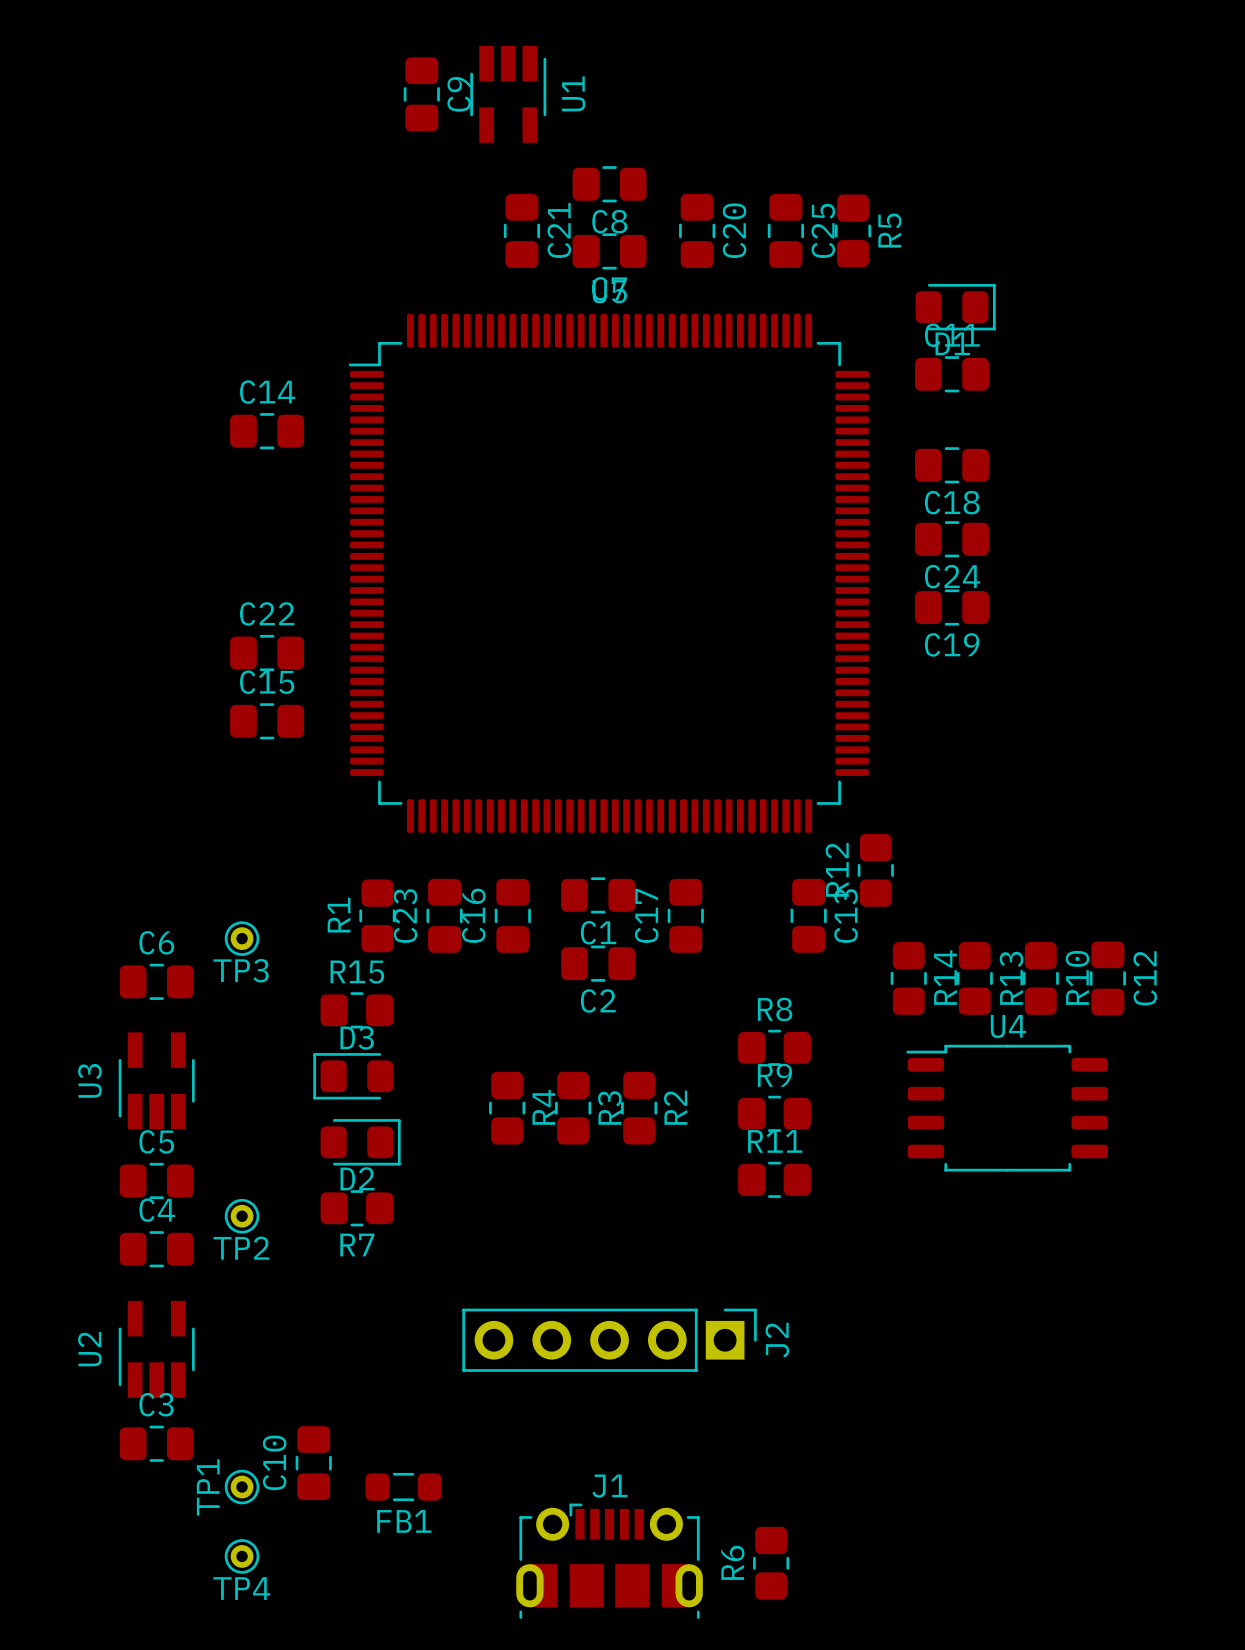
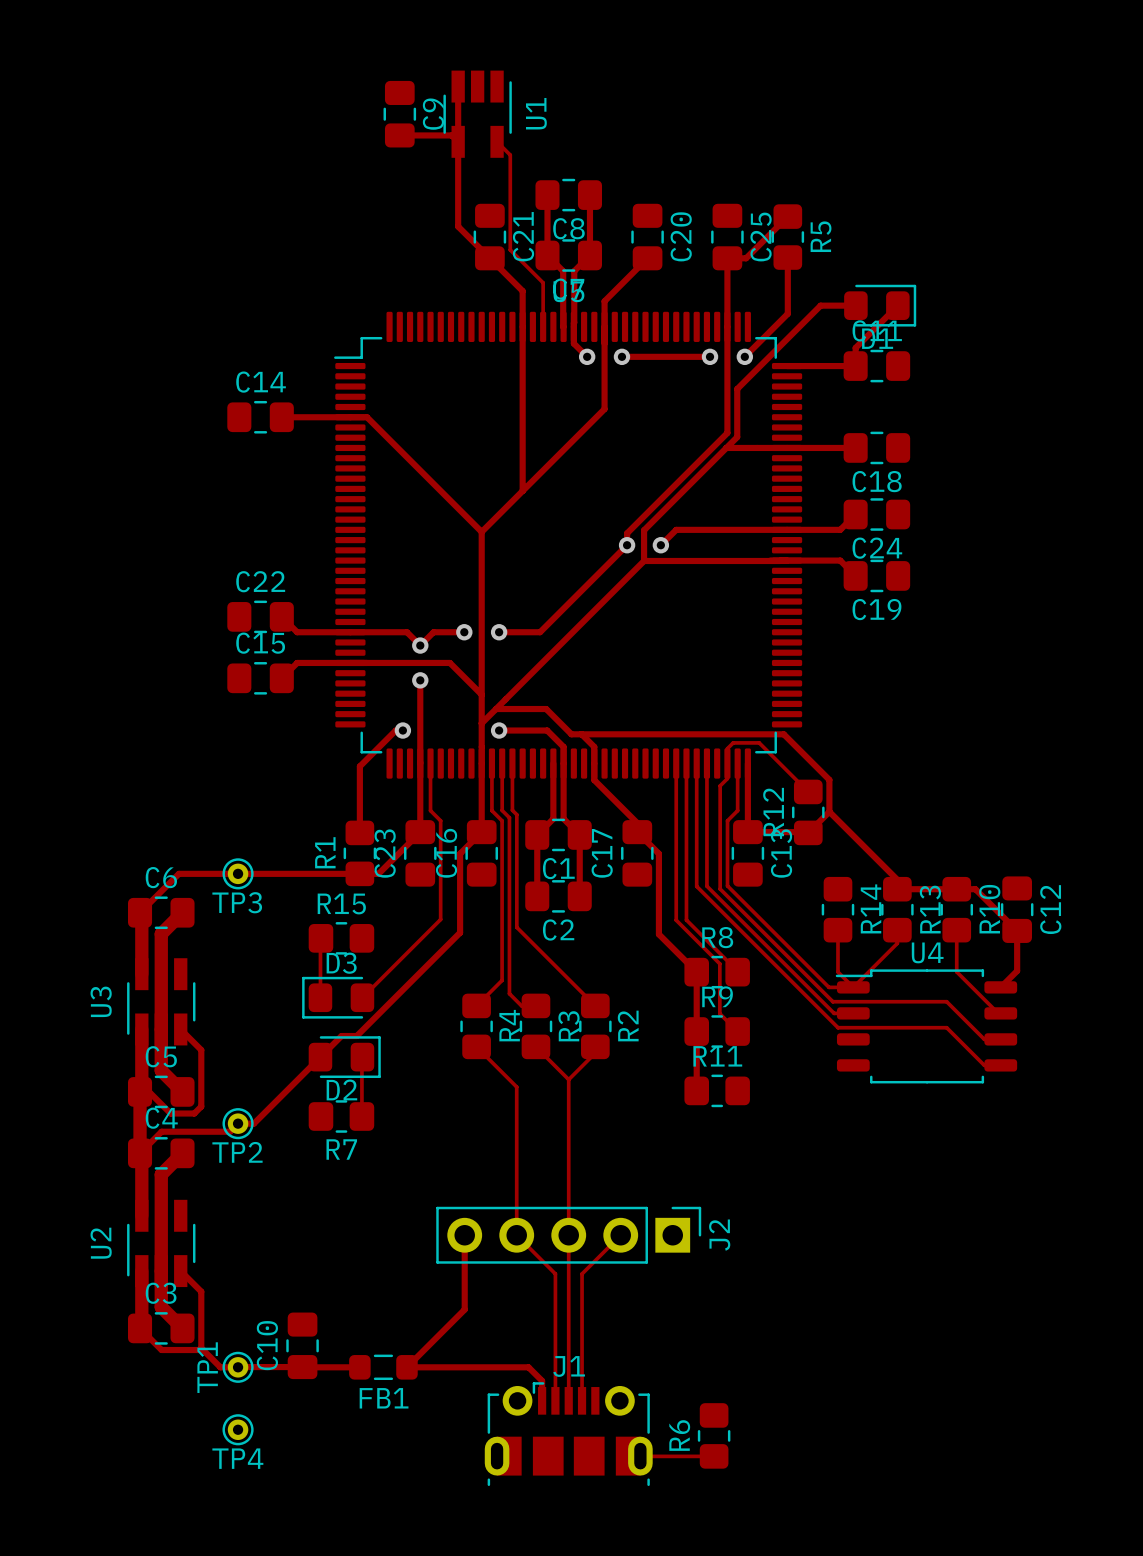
track: none -> (458, 86) (458, 226) (522, 291) (522, 491)
track: none -> (399, 135) (451, 135) (458, 141)
track: none -> (497, 141) (510, 155) (510, 249) (543, 282) (543, 326)
track: none -> (547, 195) (547, 255) (563, 271) (563, 326)
track: none -> (589, 195) (589, 255) (574, 271) (573, 343) (587, 356)
track: none -> (787, 216) (746, 258) (727, 258) (727, 433) (627, 533) (627, 545) (540, 632) (499, 632)
track: none -> (787, 257) (787, 313) (744, 356)
track: none -> (647, 258) (604, 301) (604, 409) (481, 531)
track: none -> (855, 305) (820, 305) (737, 389) (737, 437) (644, 530) (644, 560)
track: none -> (897, 305) (855, 347) (855, 366) (787, 366)
via: none -> (587, 356)
track: none -> (621, 356) (710, 356)
via: none -> (621, 356)
via: none -> (710, 356)
via: none -> (744, 356)
track: none -> (281, 417) (367, 417) (481, 531)
track: none -> (726, 447) (855, 447)
track: none -> (855, 514) (840, 529) (676, 529) (660, 545)
track: none -> (481, 531) (481, 832) (460, 853) (460, 932) (356, 1036) (341, 1036) (253, 1123) (238, 1123) (229, 1131) (161, 1131) (140, 1153)
via: none -> (627, 545)
via: none -> (660, 545)
track: none -> (644, 560) (481, 723)
track: none -> (770, 560) (840, 560) (855, 575)
track: none -> (780, 560) (644, 560)
track: none -> (281, 616) (297, 632) (406, 632) (420, 645) (433, 632) (464, 632)
via: none -> (464, 632)
via: none -> (499, 632)
via: none -> (420, 645)
track: none -> (281, 678) (297, 662) (449, 662) (481, 694)
track: none -> (420, 680) (420, 832) (378, 873) (178, 873) (140, 912) (141, 914) (141, 974)
via: none -> (420, 680)
track: none -> (496, 709) (546, 709) (571, 734) (783, 734) (829, 779) (829, 811)
track: none -> (402, 730) (395, 730) (359, 766) (359, 832)
via: none -> (402, 730)
track: none -> (499, 730) (547, 730) (563, 746) (563, 818) (579, 834) (579, 896)
via: none -> (499, 730)
track: none -> (581, 734) (594, 746) (594, 780) (637, 823) (637, 832) (658, 853) (658, 934) (696, 972) (696, 1090)
track: none -> (430, 763) (430, 810) (440, 820) (440, 919) (362, 997)
track: none -> (491, 763) (491, 810) (502, 820) (502, 980) (476, 1005)
track: none -> (502, 763) (502, 810) (509, 817) (509, 993) (521, 1005) (535, 1005)
track: none -> (512, 763) (512, 810) (516, 814) (516, 927) (595, 1005)
track: none -> (553, 763) (553, 818) (537, 834) (537, 896)
track: none -> (676, 763) (676, 920) (719, 963) (719, 1013) (737, 1031)
track: none -> (686, 763) (686, 920) (737, 972)
track: none -> (696, 763) (696, 886) (838, 1027) (946, 1027) (984, 1065) (1000, 1065)
track: none -> (706, 763) (706, 886) (834, 1013) (853, 1013)
track: none -> (737, 763) (737, 810) (727, 820) (727, 885) (828, 987) (853, 987)
track: none -> (747, 763) (747, 832) (808, 832) (829, 811)
track: none -> (808, 791) (759, 742) (733, 742) (727, 748) (727, 778) (720, 785) (720, 888) (832, 1001) (946, 1001) (984, 1039) (1000, 1039)
track: none -> (829, 811) (897, 879) (897, 889) (975, 889) (1017, 930) (1017, 971) (1000, 987)
track: none -> (182, 912) (161, 934) (161, 1070) (182, 1091)
track: none -> (837, 930) (837, 972) (853, 987)
track: none -> (897, 930) (897, 943) (853, 987)
track: none -> (956, 930) (956, 971) (998, 1013) (1000, 1013)
track: none -> (320, 938) (320, 997)
track: none -> (141, 1029) (141, 1090) (140, 1091)
track: none -> (180, 1029) (201, 1050) (201, 1106) (194, 1113) (170, 1113) (149, 1091) (140, 1091)
track: none -> (476, 1046) (516, 1087) (516, 1235) (555, 1273) (555, 1400)
track: none -> (535, 1046) (568, 1079)
track: none -> (595, 1046) (595, 1053) (568, 1079)
track: none -> (362, 1057) (361, 1116)
track: none -> (568, 1079) (568, 1400)
track: none -> (140, 1091) (140, 1153)
track: none -> (140, 1153) (141, 1155) (141, 1215)
track: none -> (182, 1153) (161, 1174) (161, 1307) (182, 1328)
track: none -> (464, 1235) (464, 1309) (406, 1367) (528, 1367) (542, 1380) (542, 1400)
track: none -> (620, 1235) (582, 1273) (582, 1400)
track: none -> (141, 1271) (141, 1326) (140, 1328) (161, 1350) (203, 1350)
track: none -> (180, 1271) (201, 1291) (201, 1348) (220, 1367) (238, 1367)
track: none -> (238, 1367) (302, 1367)
track: none -> (302, 1367) (359, 1367)
track: none -> (640, 1456) (714, 1456)

